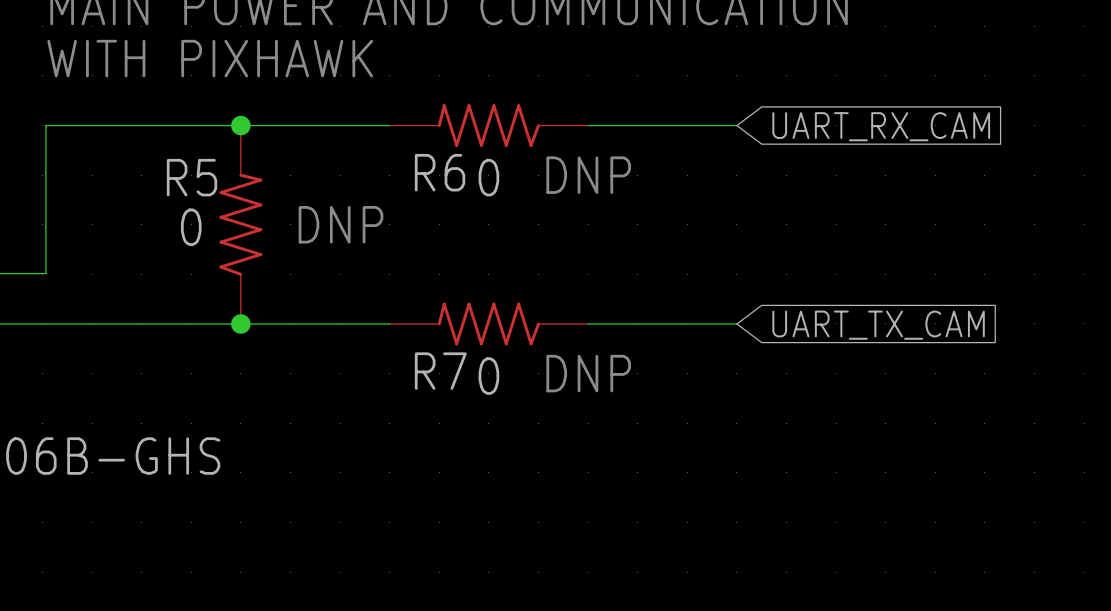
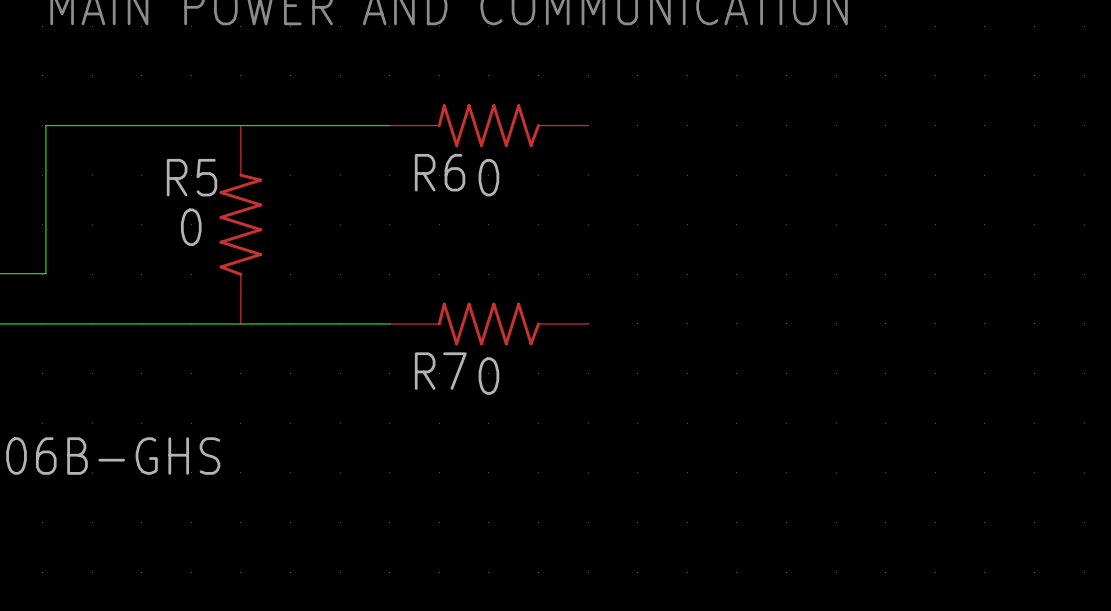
text: WITH PIXHAWK (210, 58) -> none
junction: (240, 125) -> none
wire: (588, 125) (736, 125) -> none
global label: UART_RX_CAM (881, 126) -> none
text: DNP (588, 175) -> none
text: DNP (340, 224) -> none
junction: (240, 323) -> none
wire: (588, 323) (736, 323) -> none
global label: UART_TX_CAM (878, 325) -> none
text: DNP (588, 373) -> none

